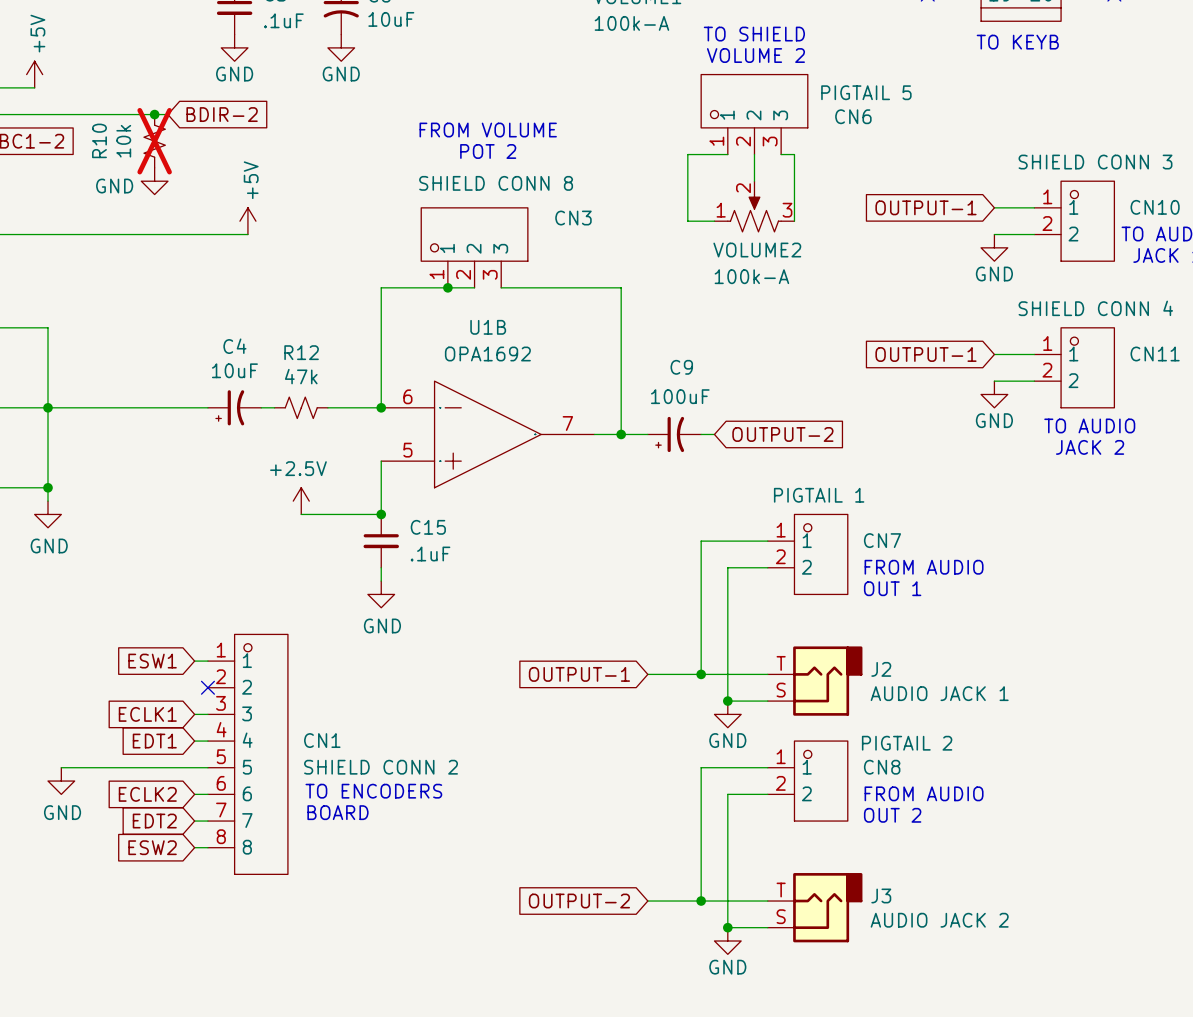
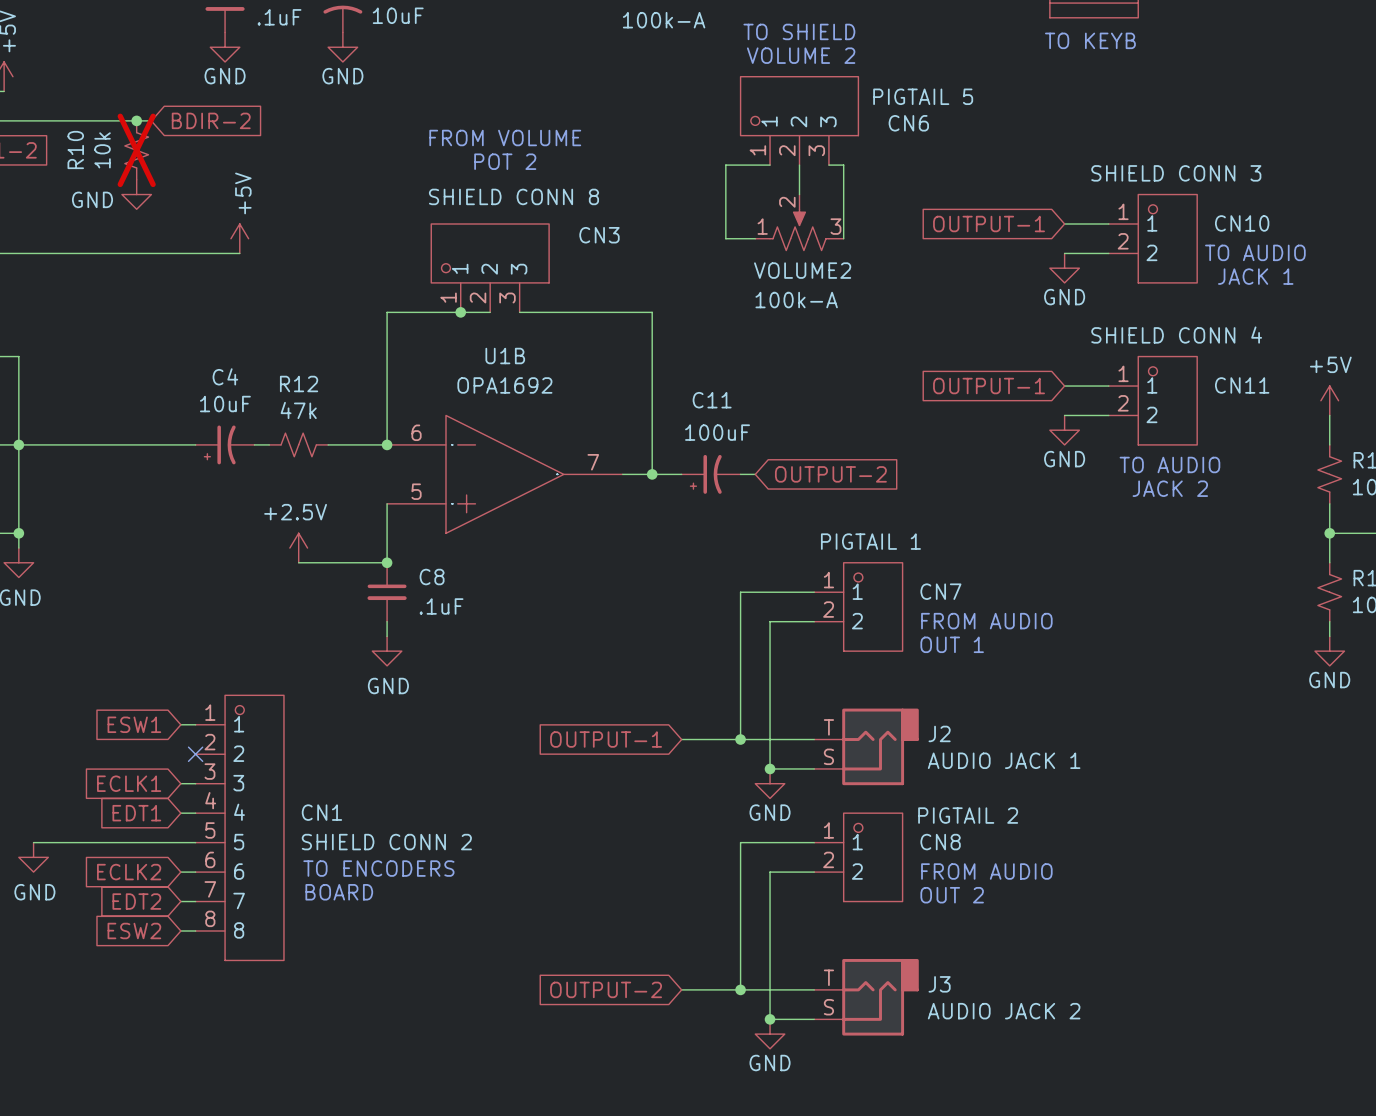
C9 name: C9 (681, 367) -> C11 (712, 400)
C15 name: C15 (428, 527) -> C8 (432, 577)

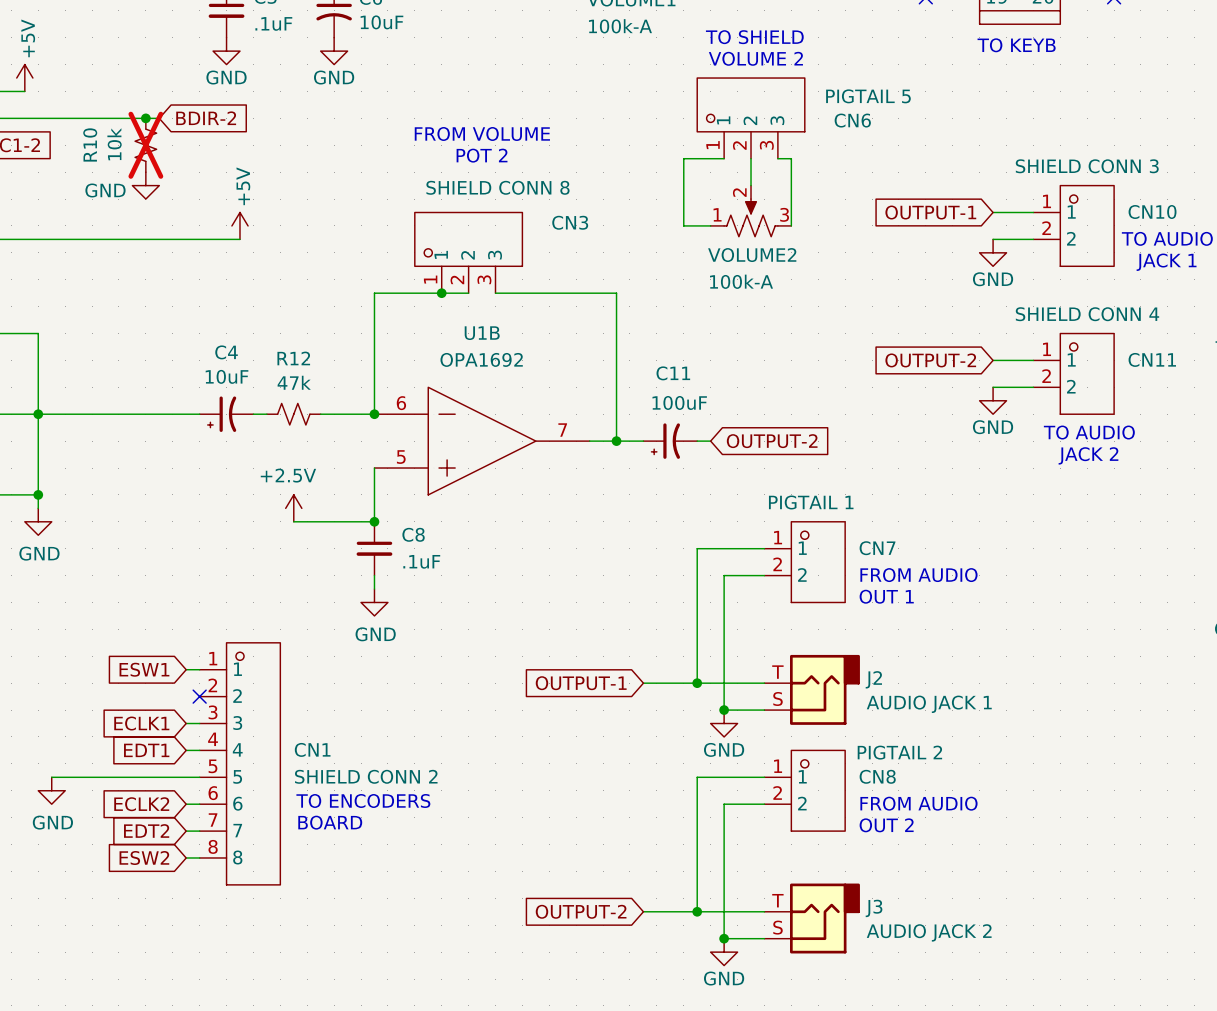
global label: OUTPUT-1 (989, 386) -> OUTPUT-2 (930, 360)

